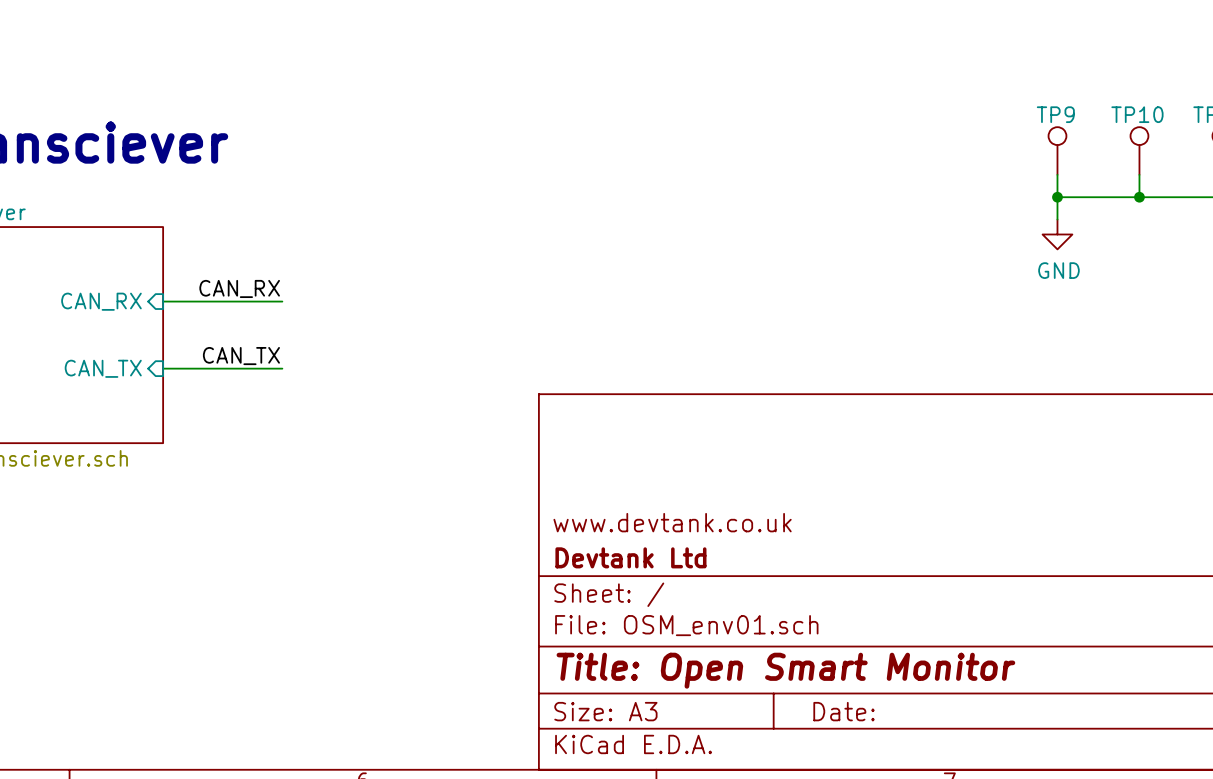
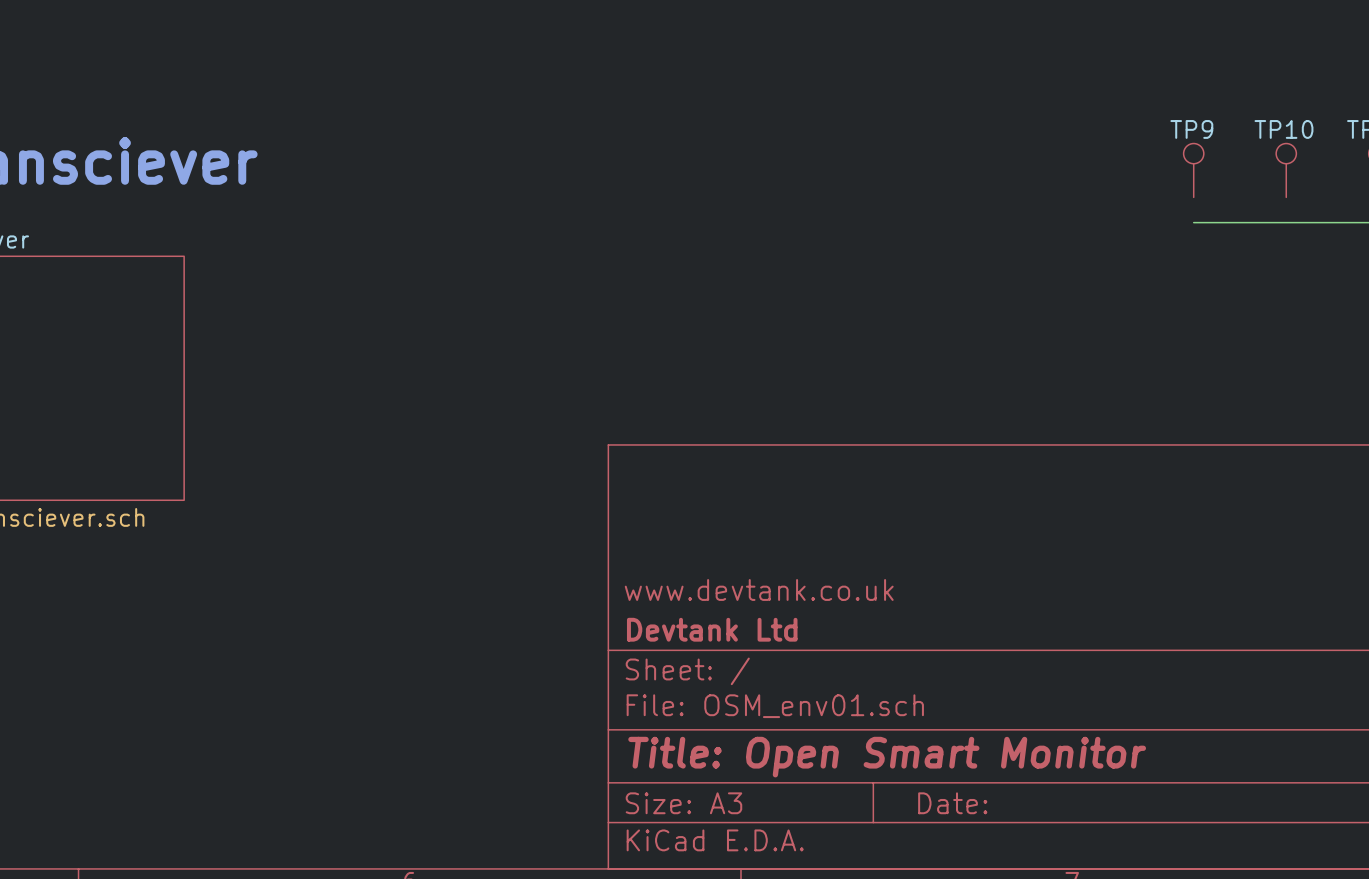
wire: (1057, 174) (1057, 219) -> none
wire: (1139, 174) (1139, 197) -> none
junction: (1057, 197) -> none
junction: (1139, 197) -> none
power symbol: GND (1057, 234) -> none
label: CAN_RX (239, 288) -> none
sheet pin: CAN_RX (101, 301) -> none
wire: (163, 301) (282, 301) -> none
label: CAN_TX (241, 356) -> none
sheet pin: CAN_TX (103, 368) -> none
wire: (163, 368) (282, 368) -> none

